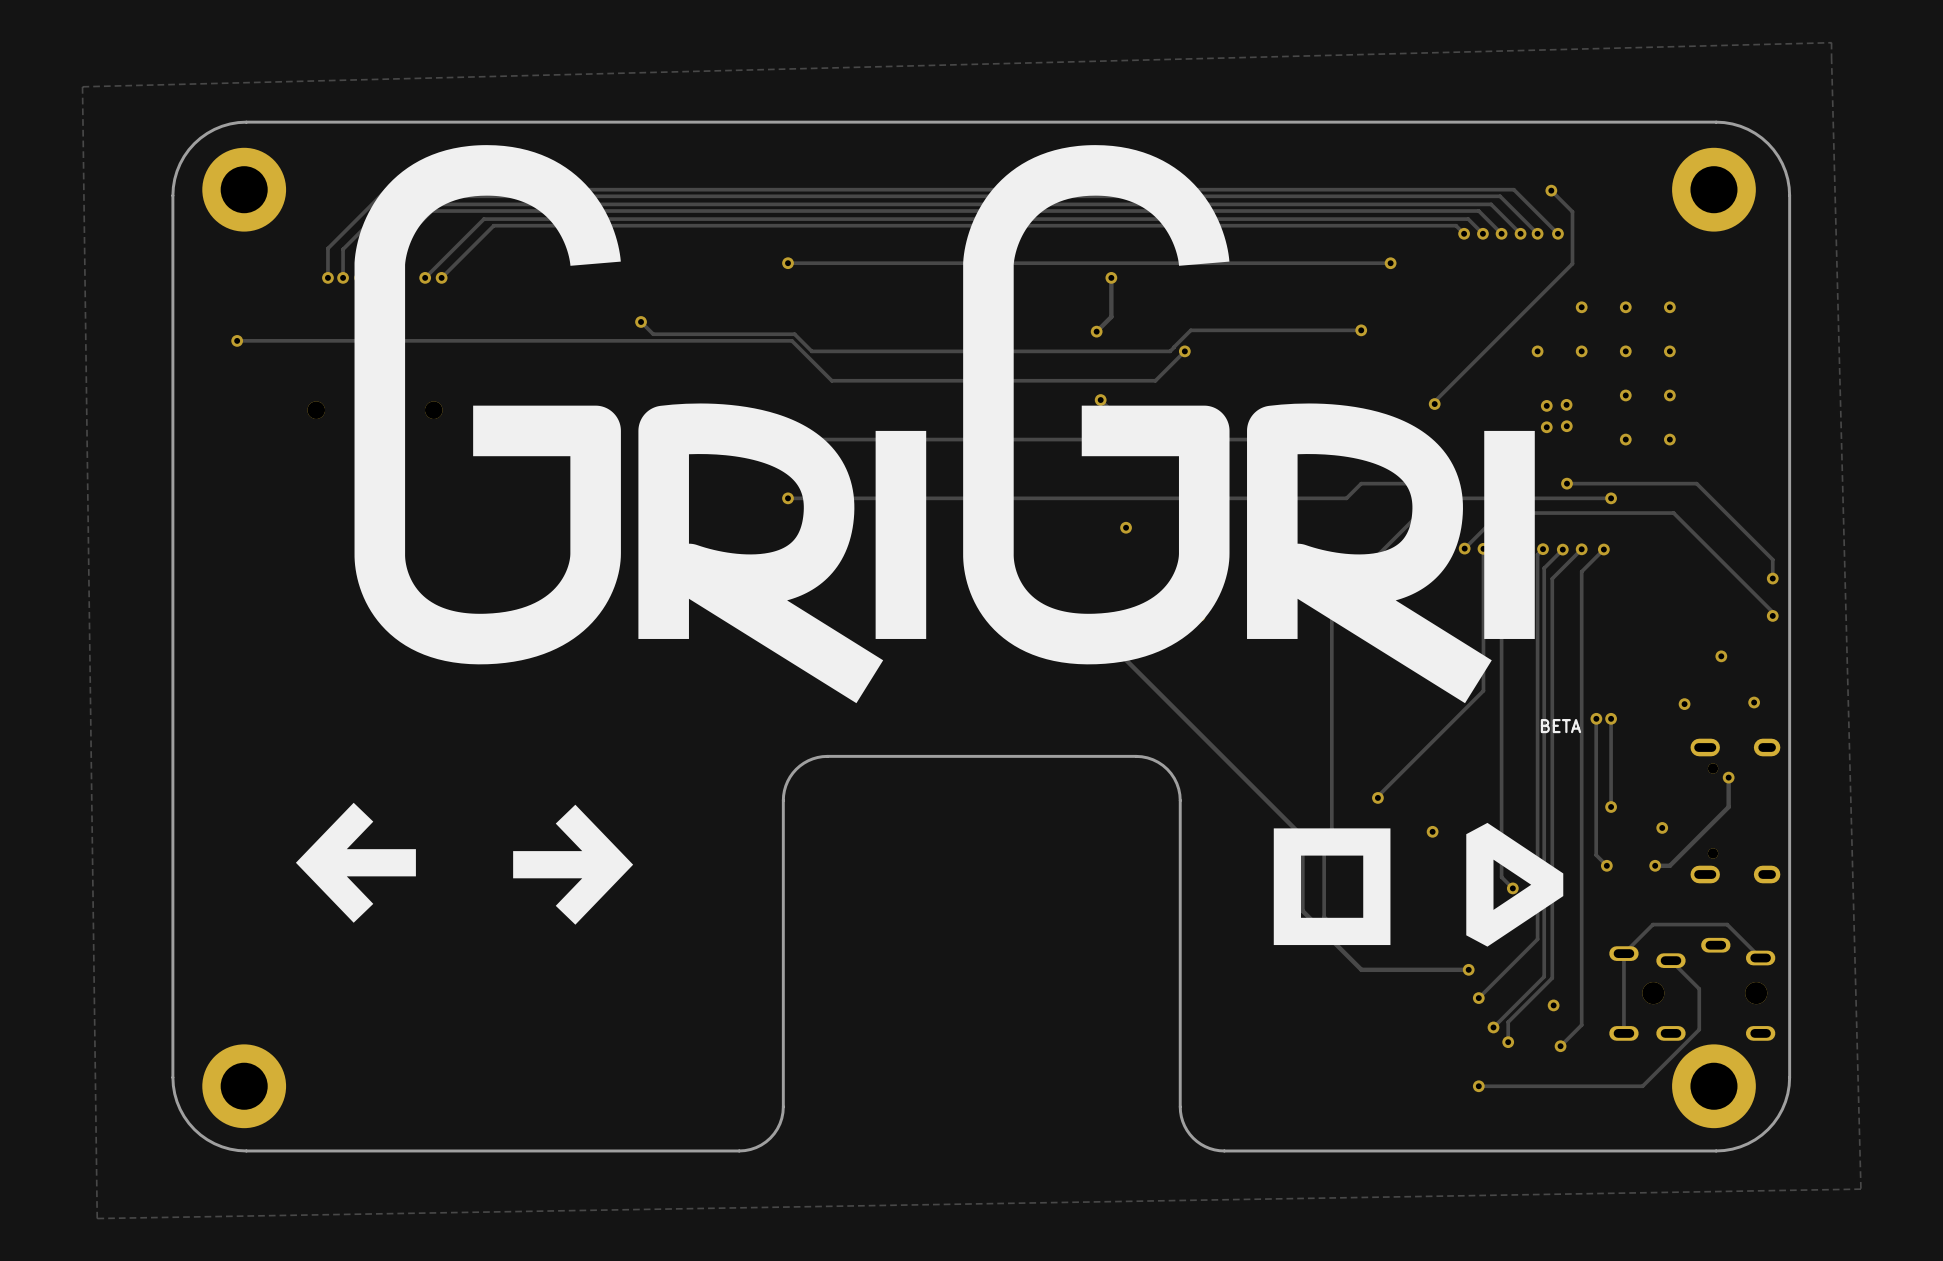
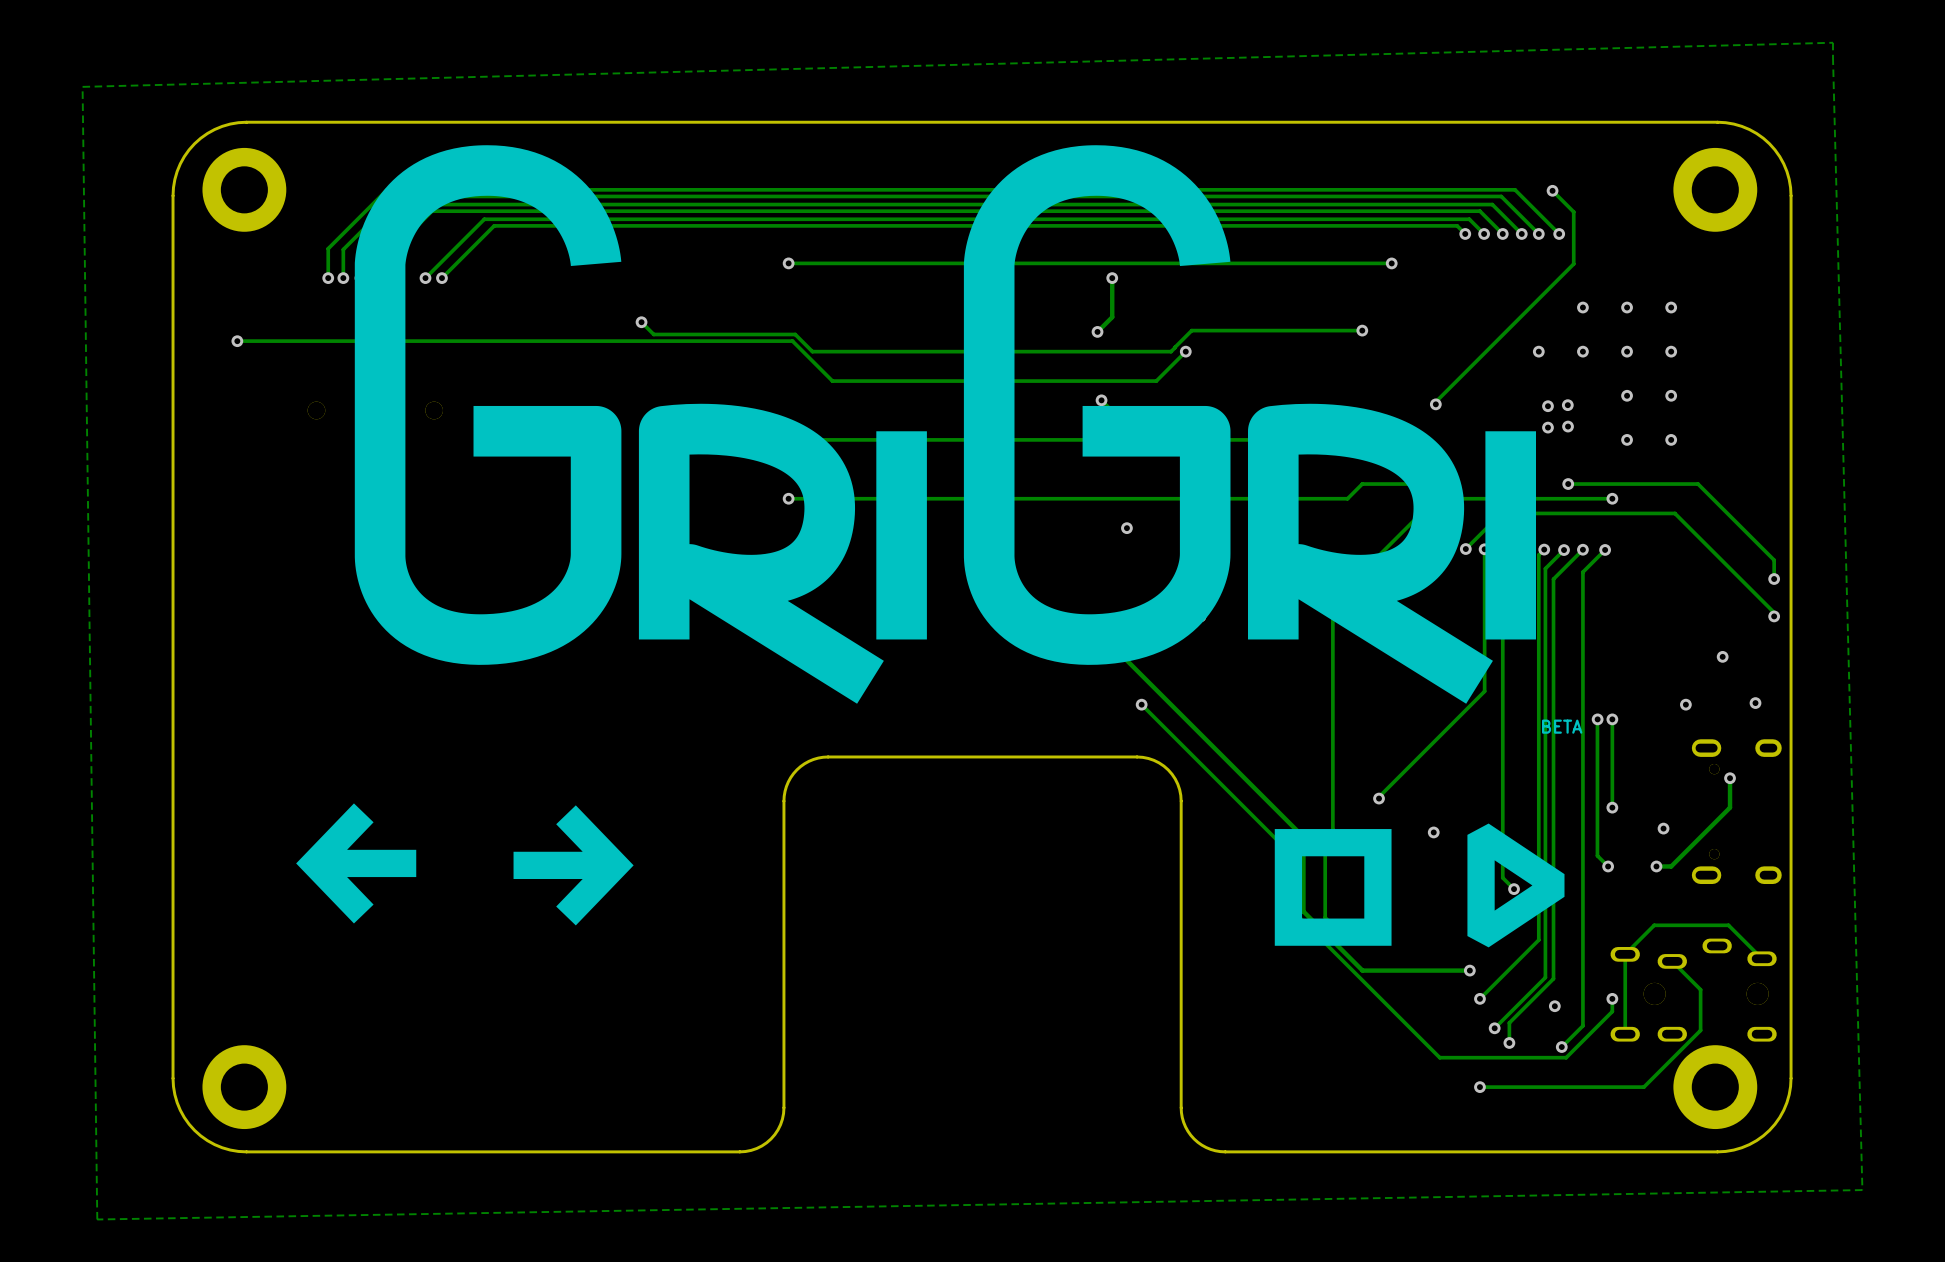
track: none -> (1141, 704) (1296, 859) (1296, 914) (1439, 1057) (1566, 1057) (1612, 1011) (1612, 998)
via: none -> (1141, 704)
via: none -> (1612, 998)

